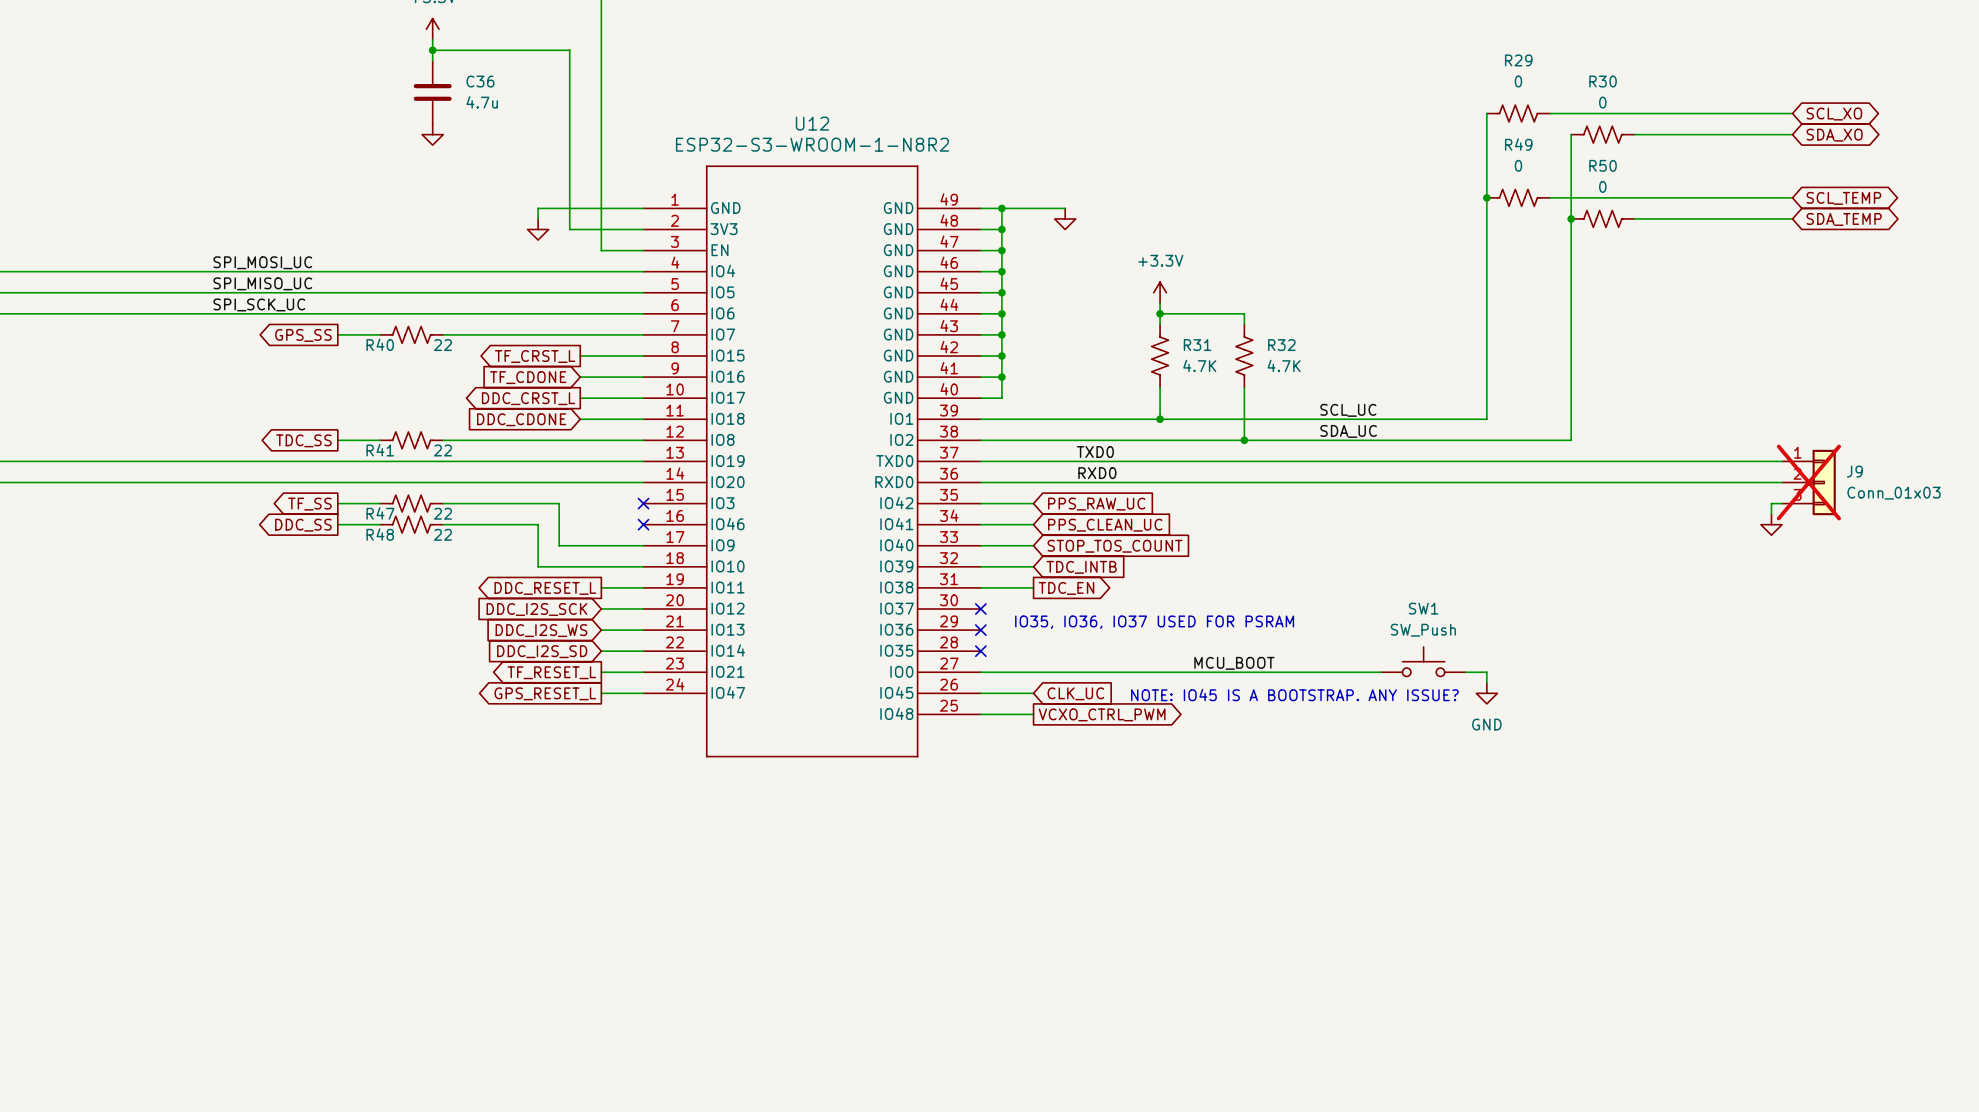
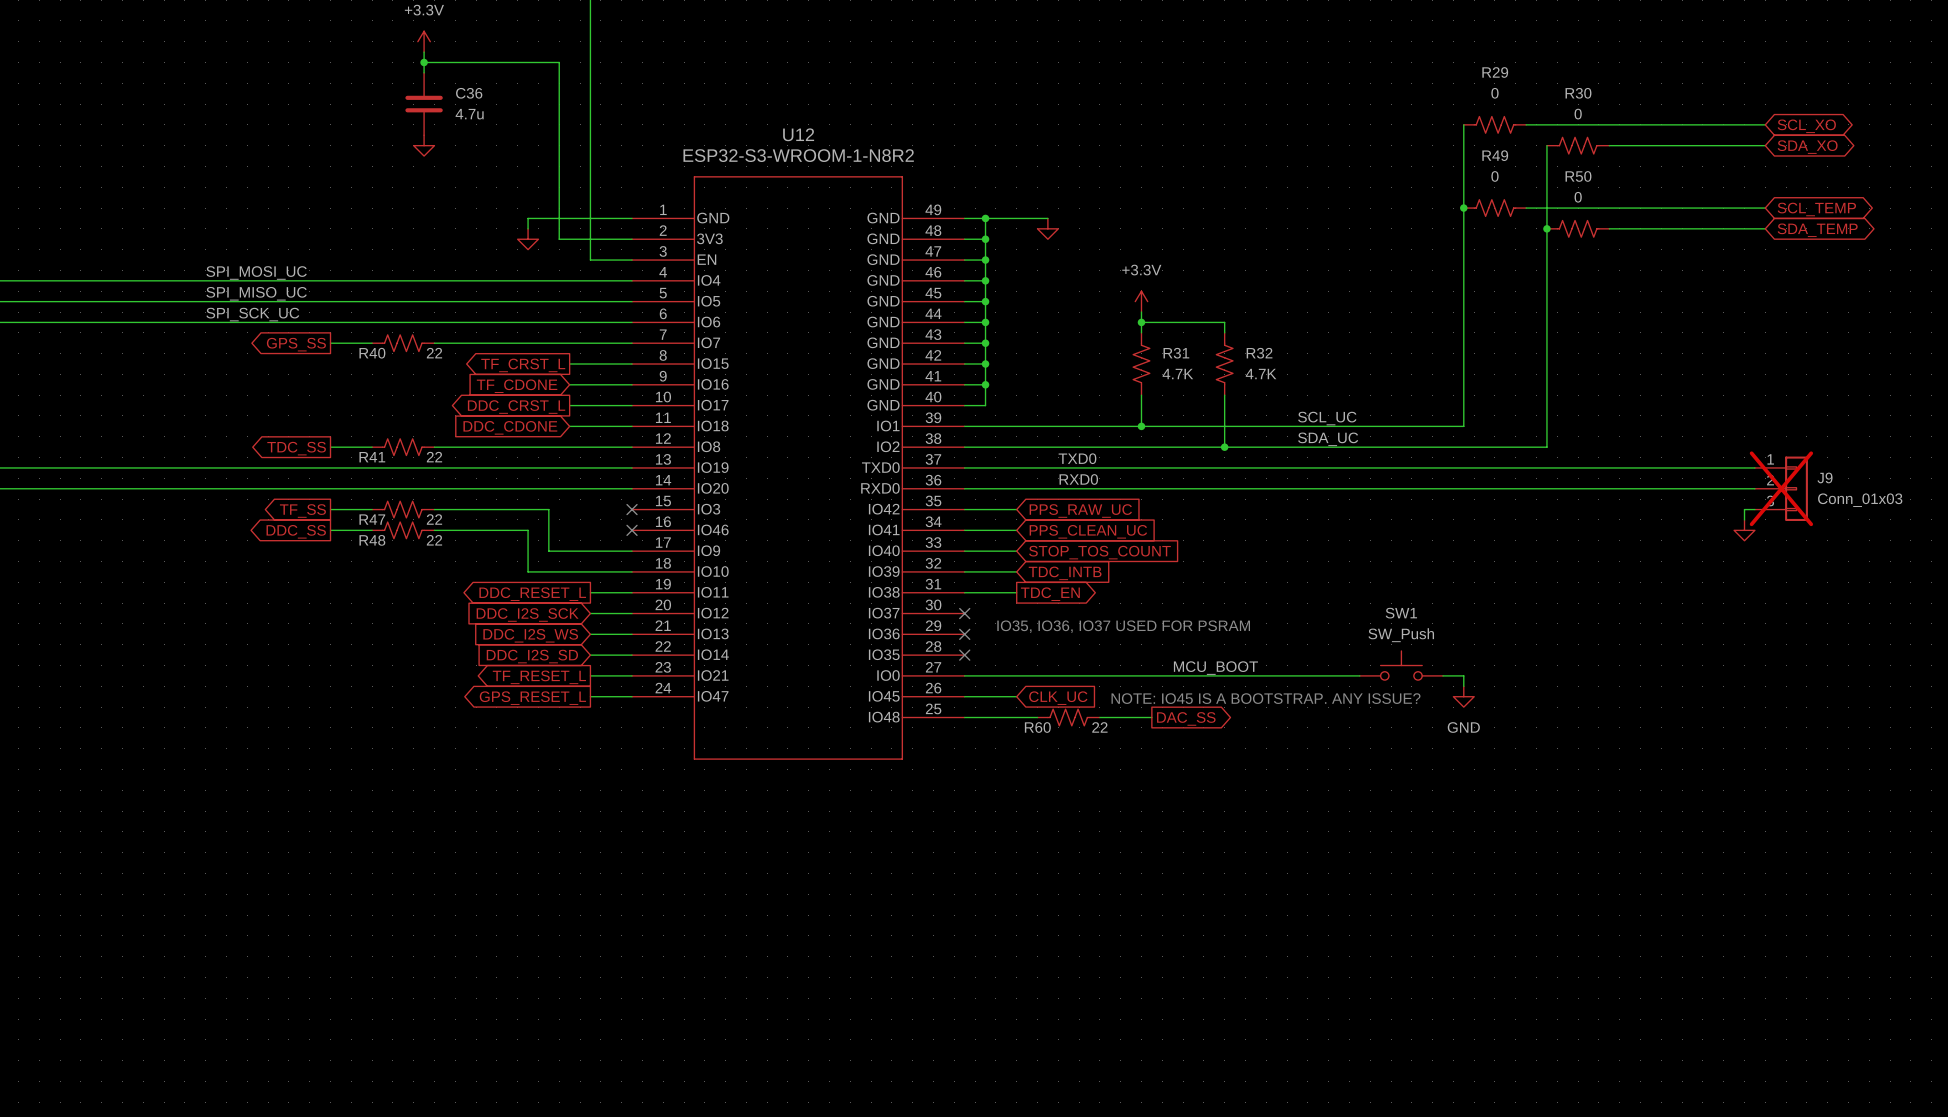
wire: none -> (1016, 717) (1037, 717)
R60: none -> 22 (1068, 717)
global label: VCXO_CTRL_PWM (1102, 714) -> none
wire: none -> (1099, 717) (1151, 717)
global label: none -> DAC_SS (1186, 718)

